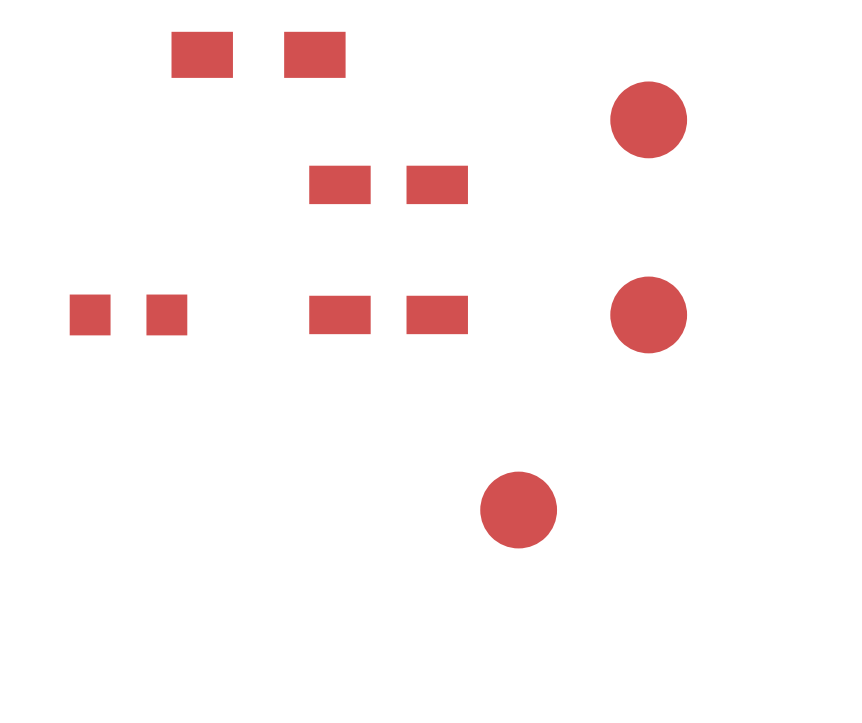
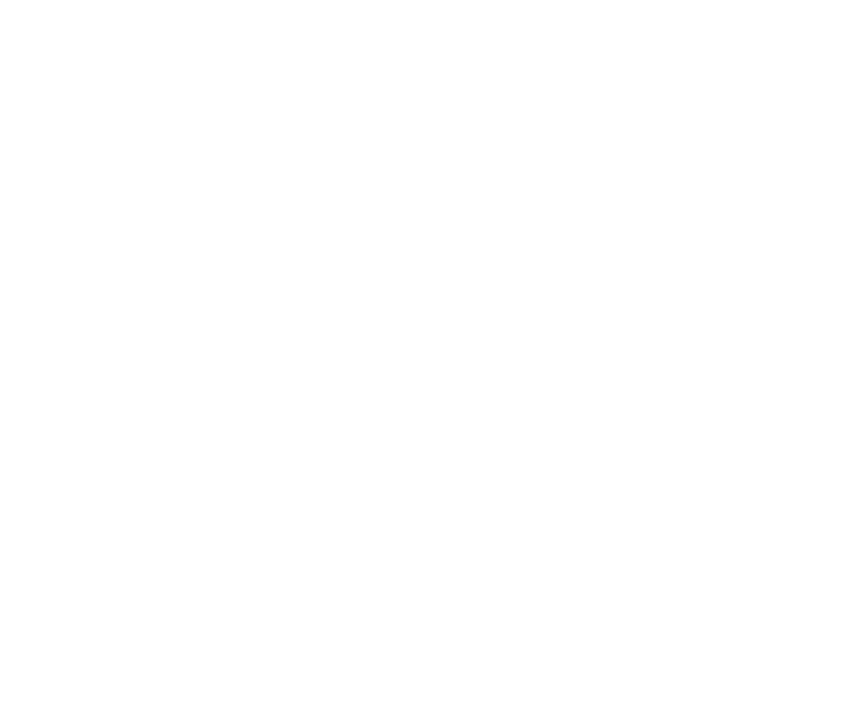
part: (258, 54) -> none
part: (648, 119) -> none
part: (388, 184) -> none
part: (128, 314) -> none
part: (388, 314) -> none
part: (648, 314) -> none
part: (518, 510) -> none

